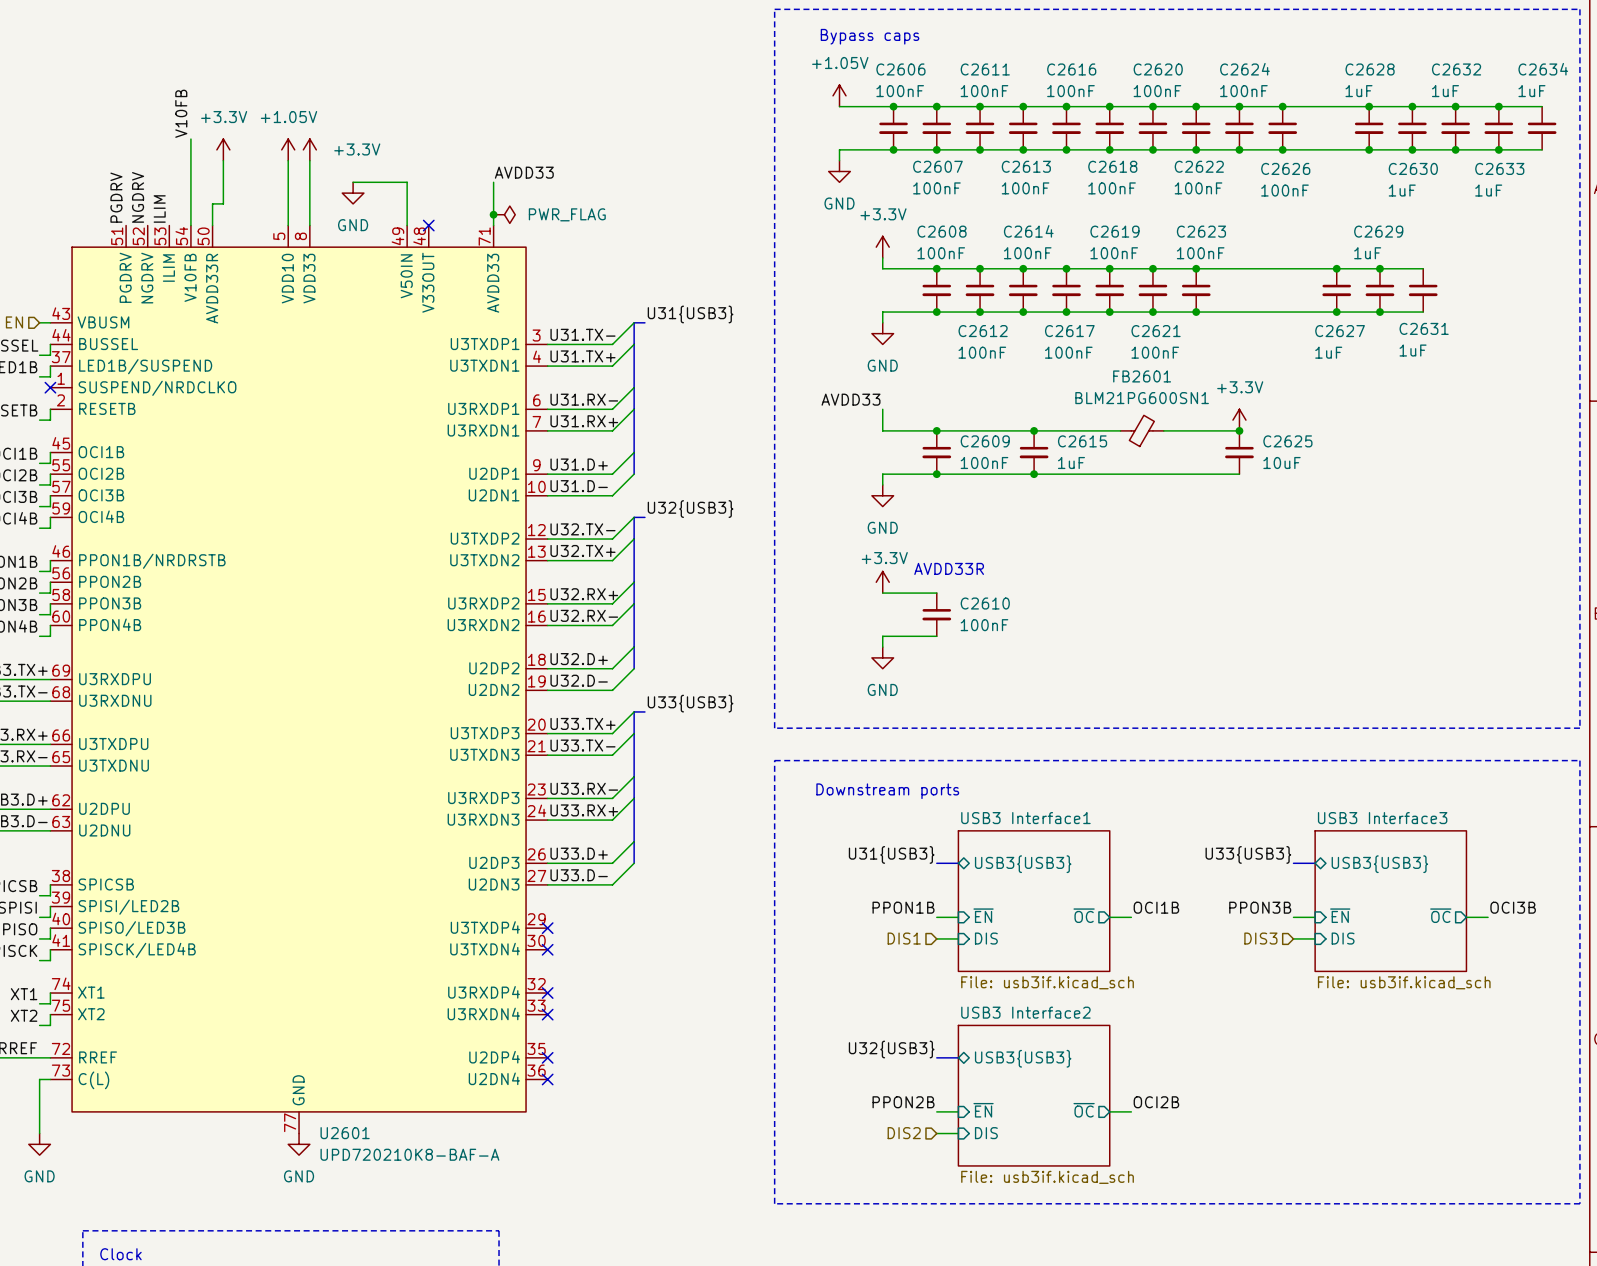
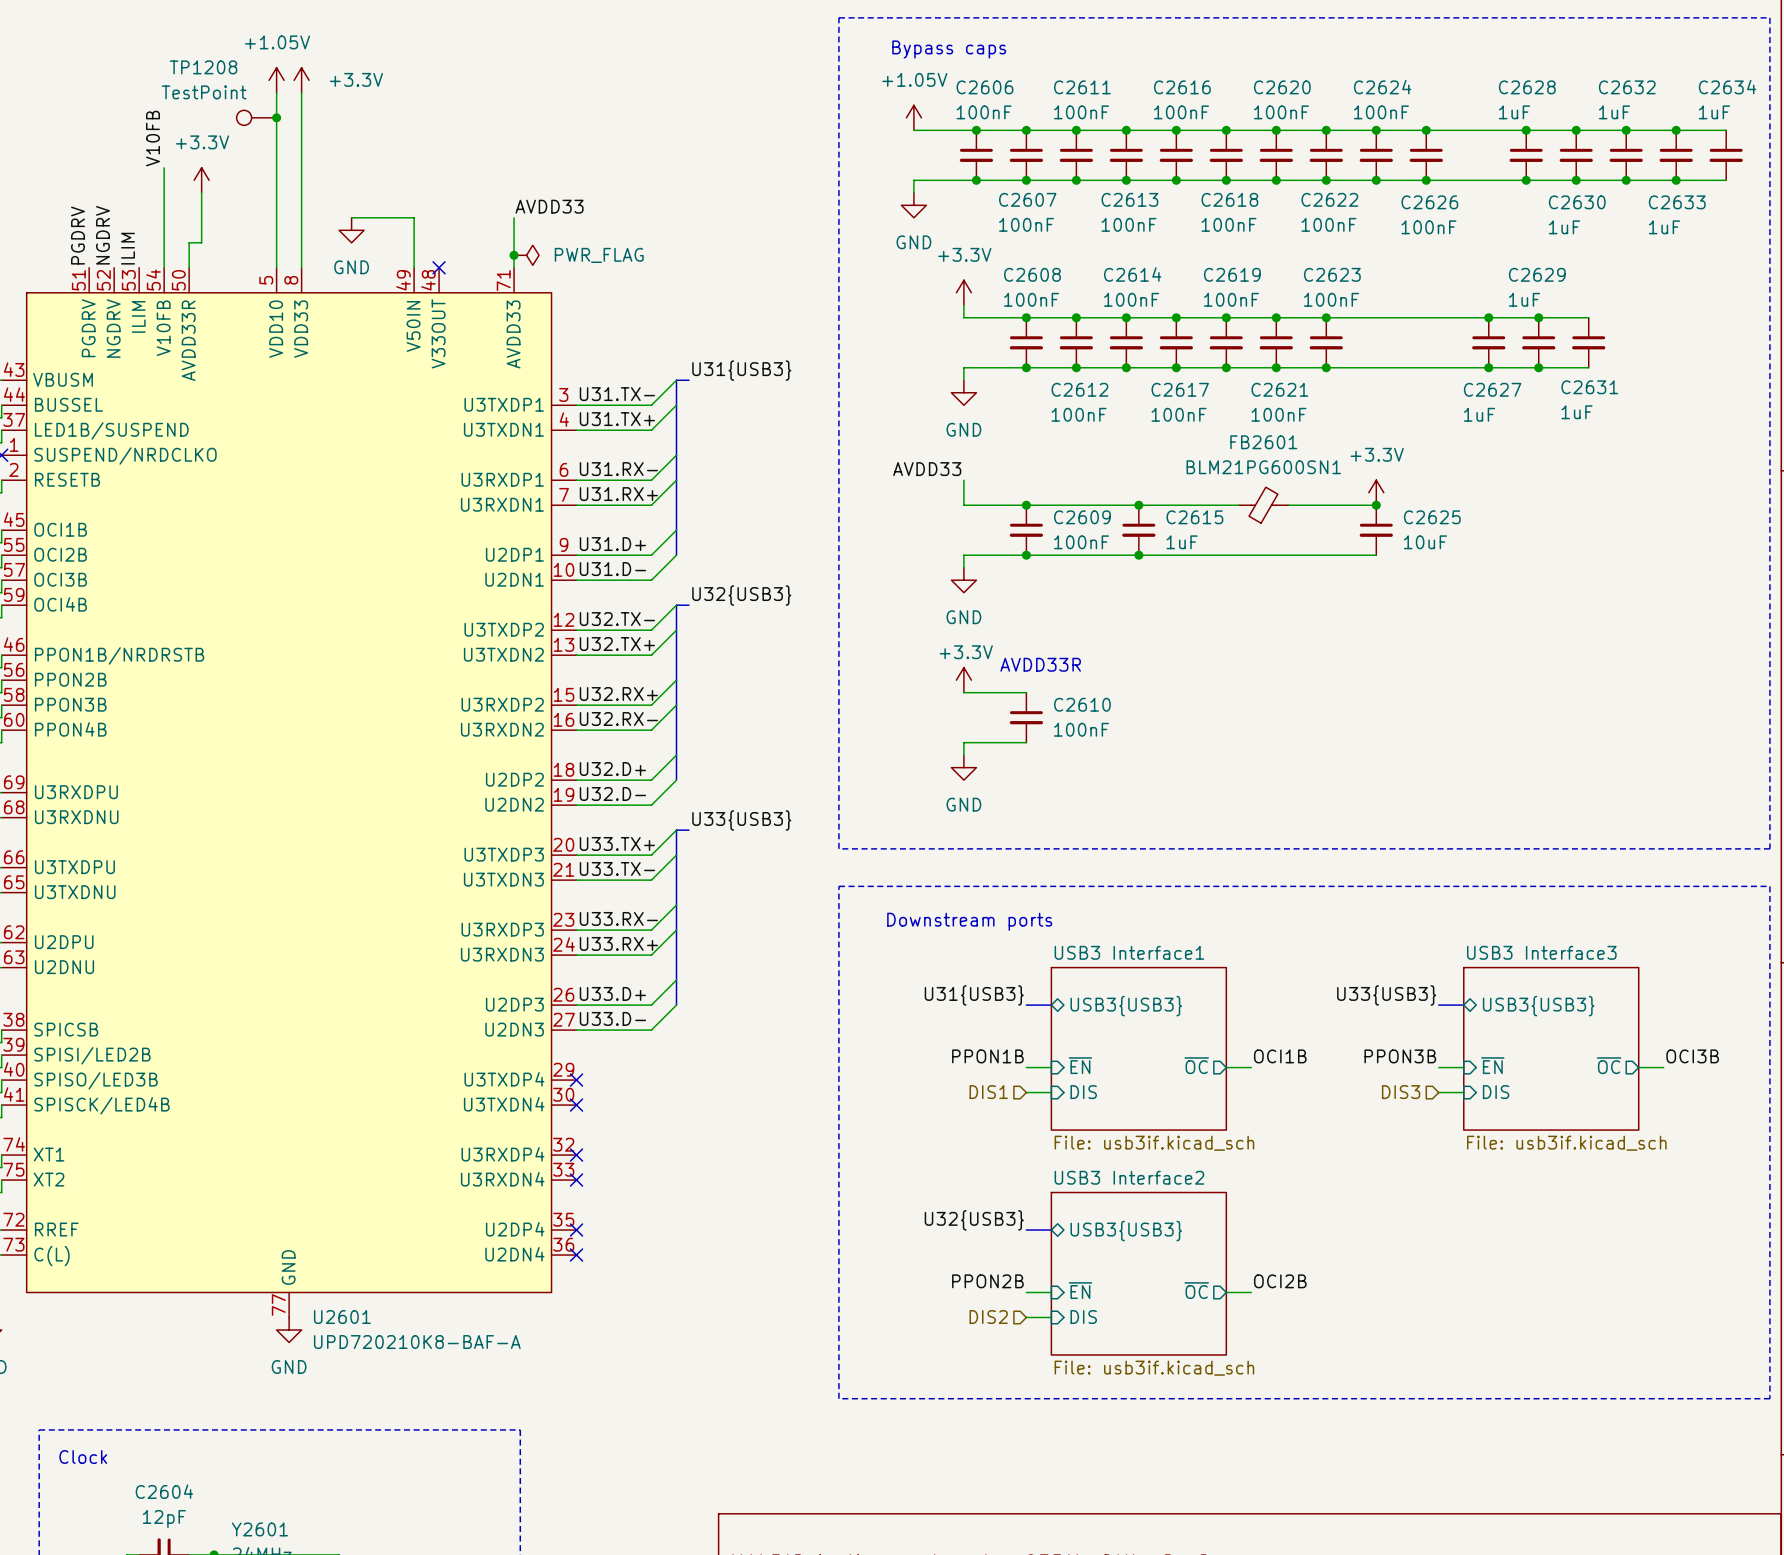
wire: none -> (276, 92) (276, 192)
wire: none -> (301, 92) (301, 192)
TP1208: none -> TestPoint (256, 117)
junction: none -> (276, 117)
power symbol position: +1.05V (288, 149) -> +1.05V (276, 80)
power symbol position: +3.3V (309, 149) -> +3.3V (301, 80)

